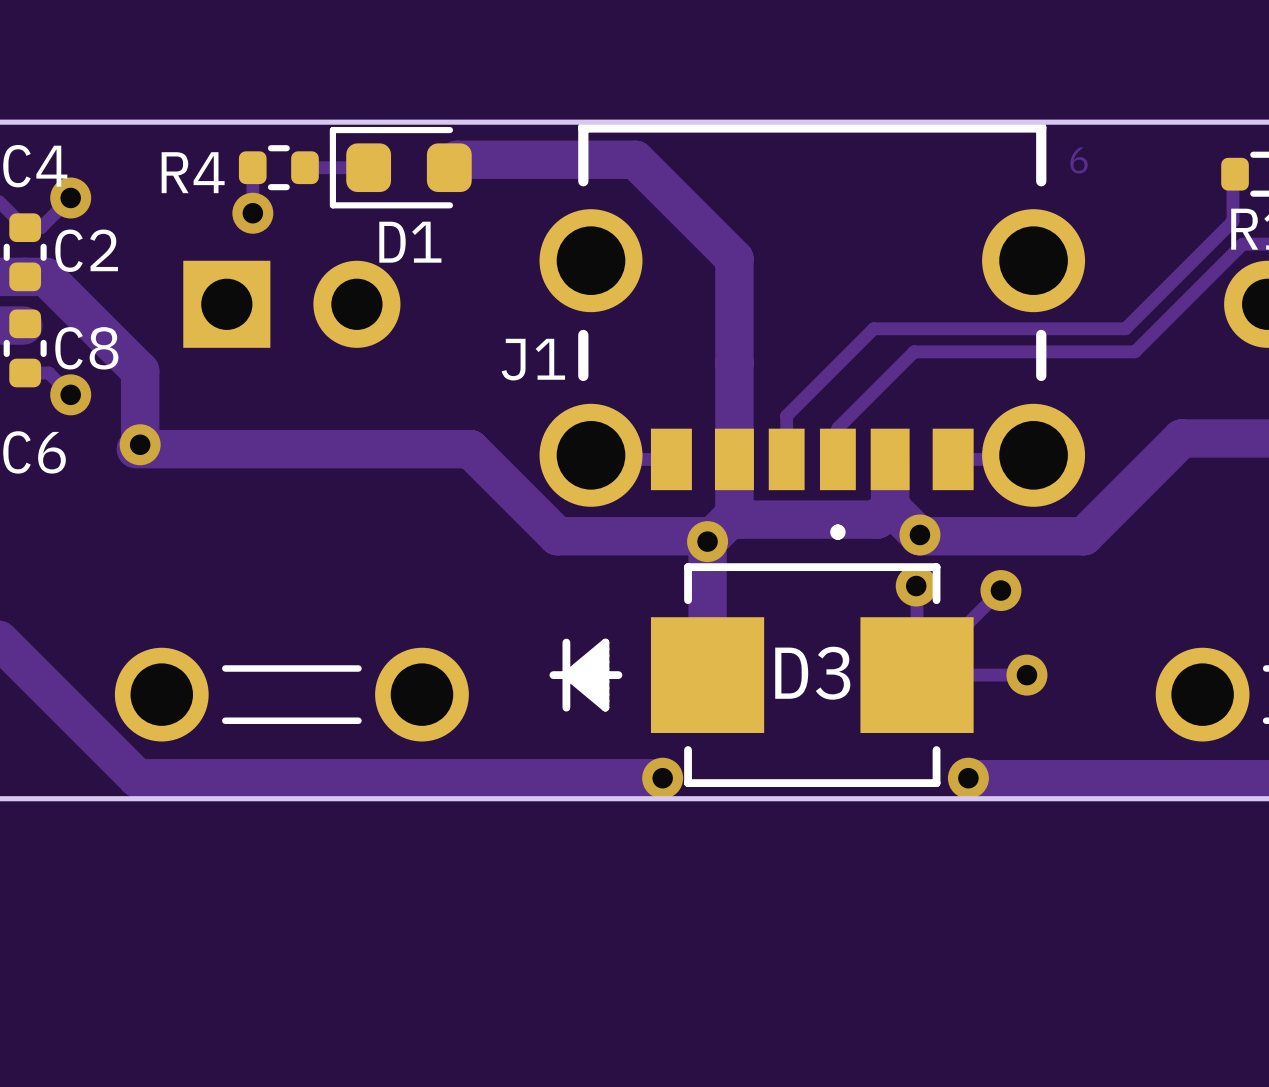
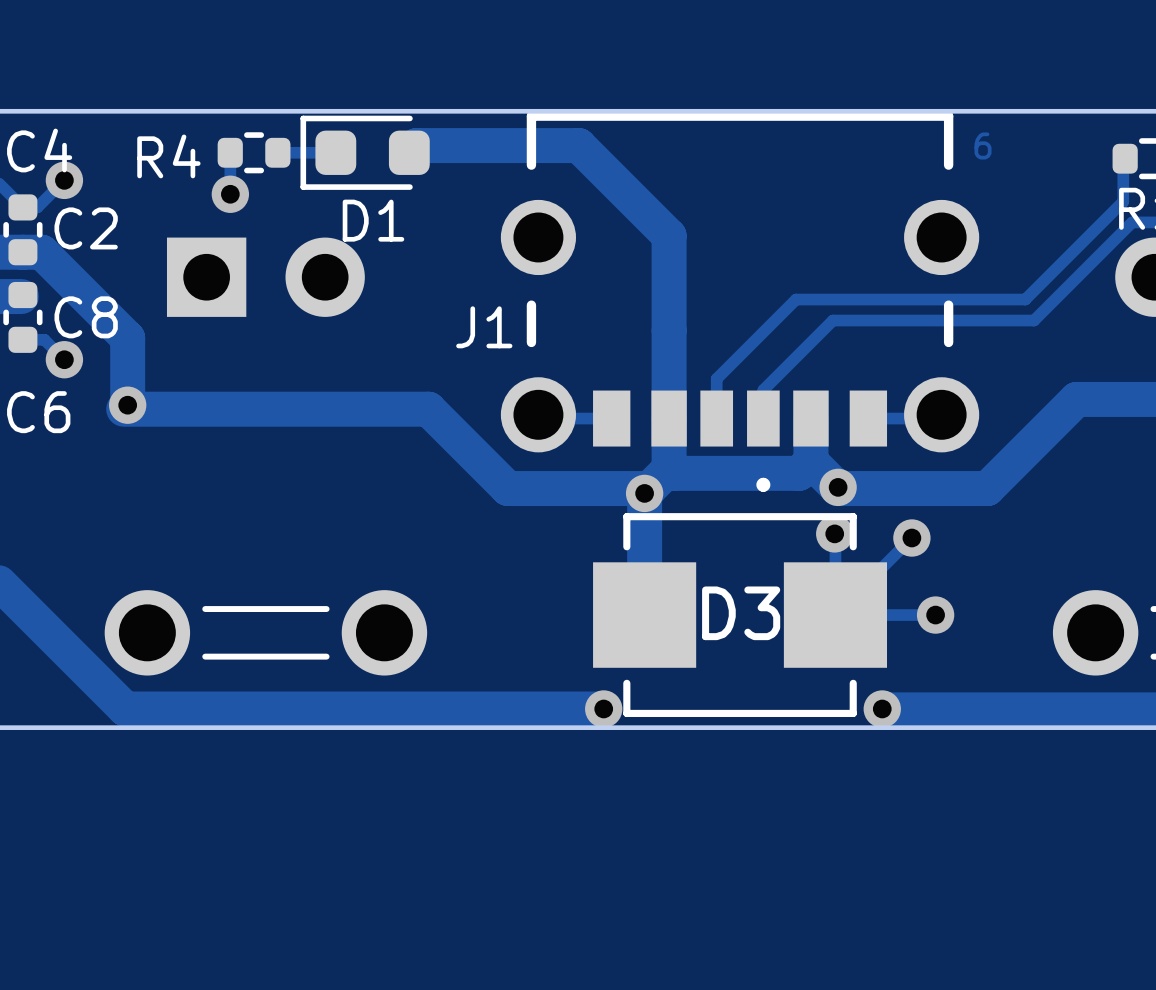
J1 footprint: [539, 122, 1086, 540] -> [500, 111, 980, 492]
D3 footprint: [549, 563, 974, 788] -> [593, 513, 888, 717]

